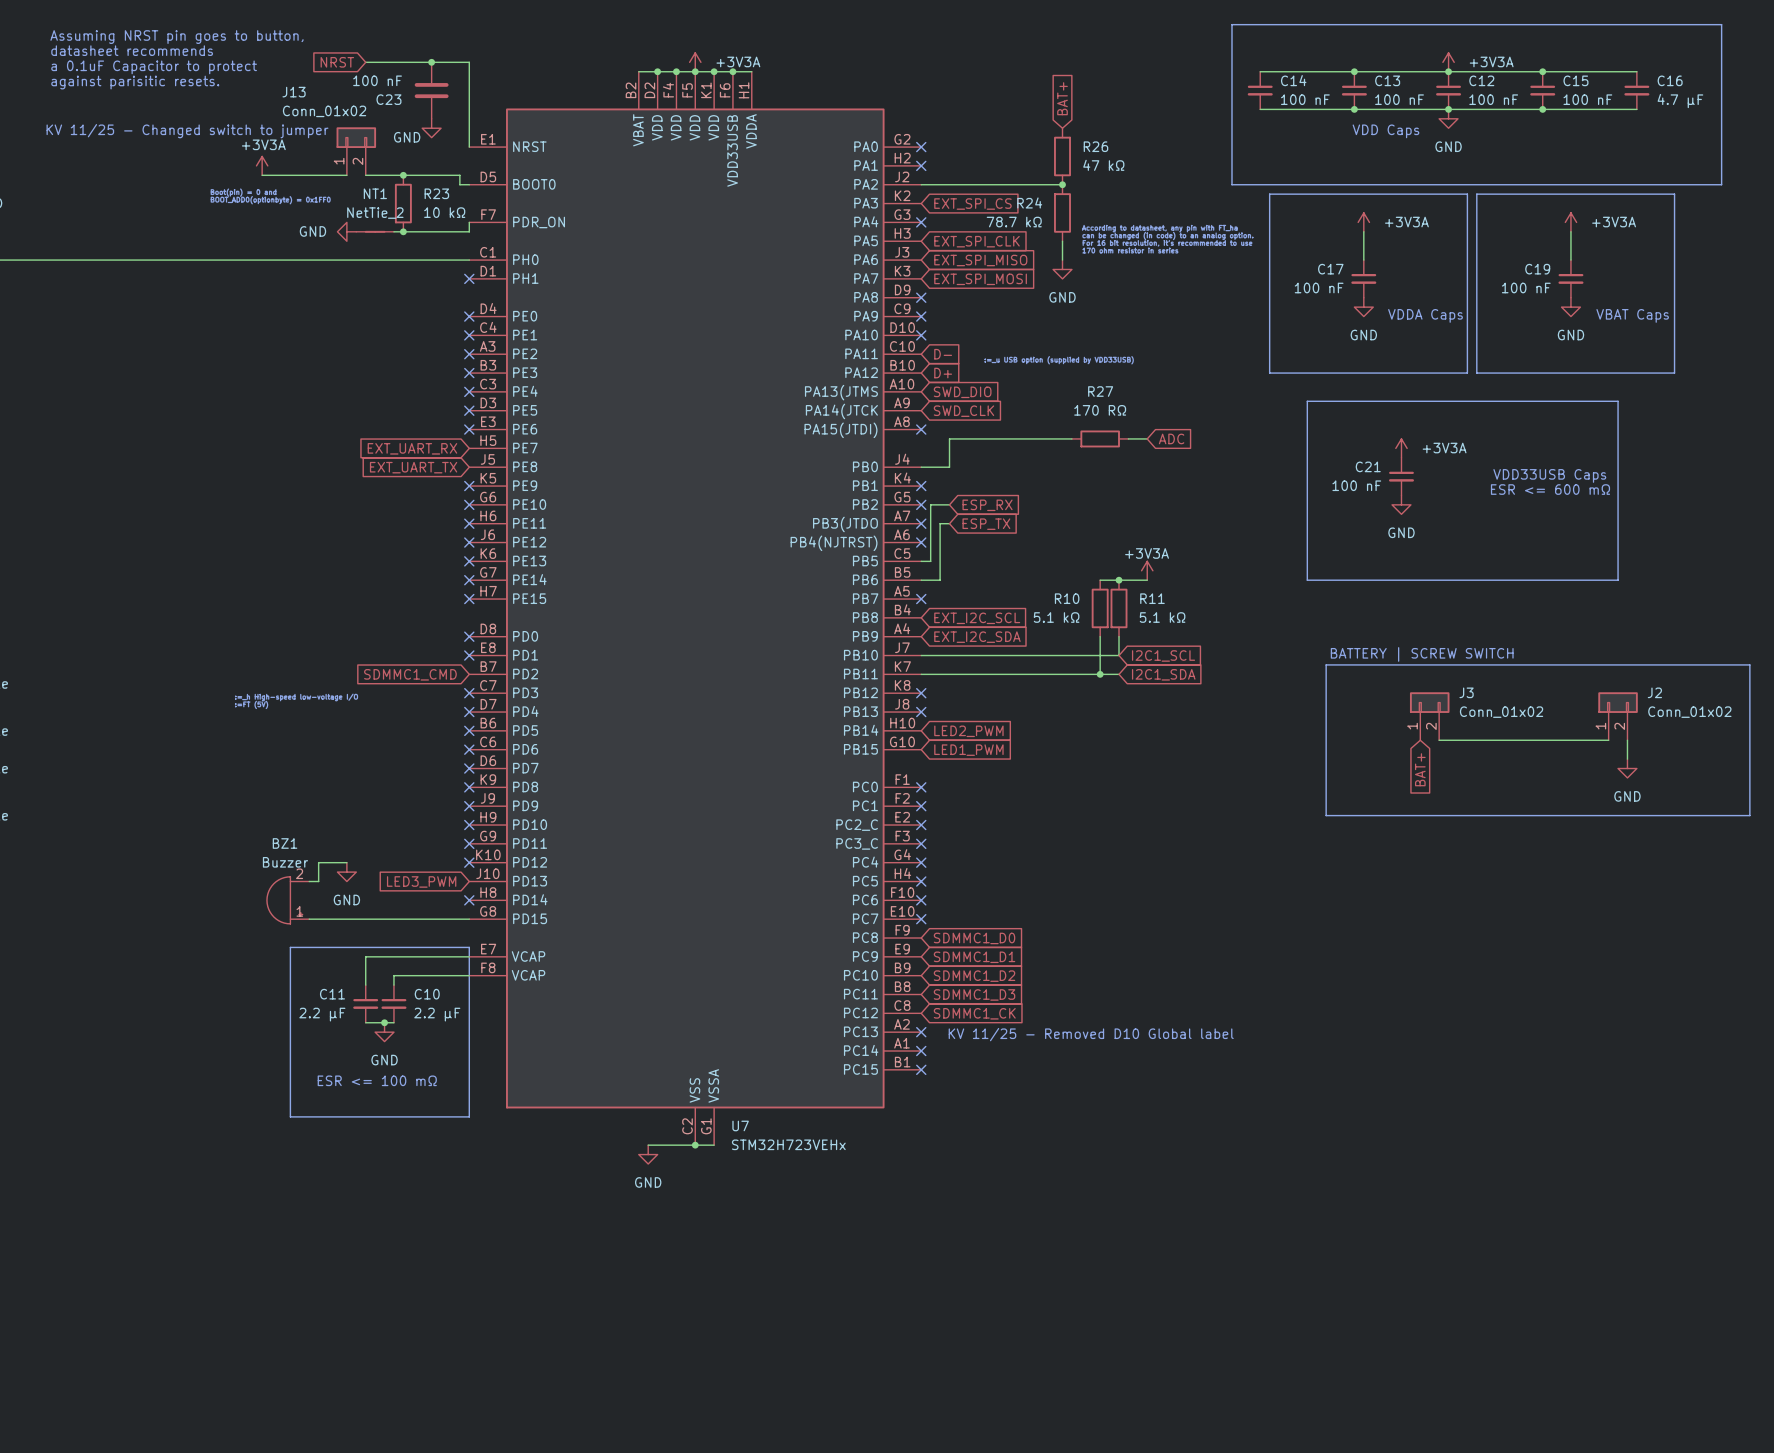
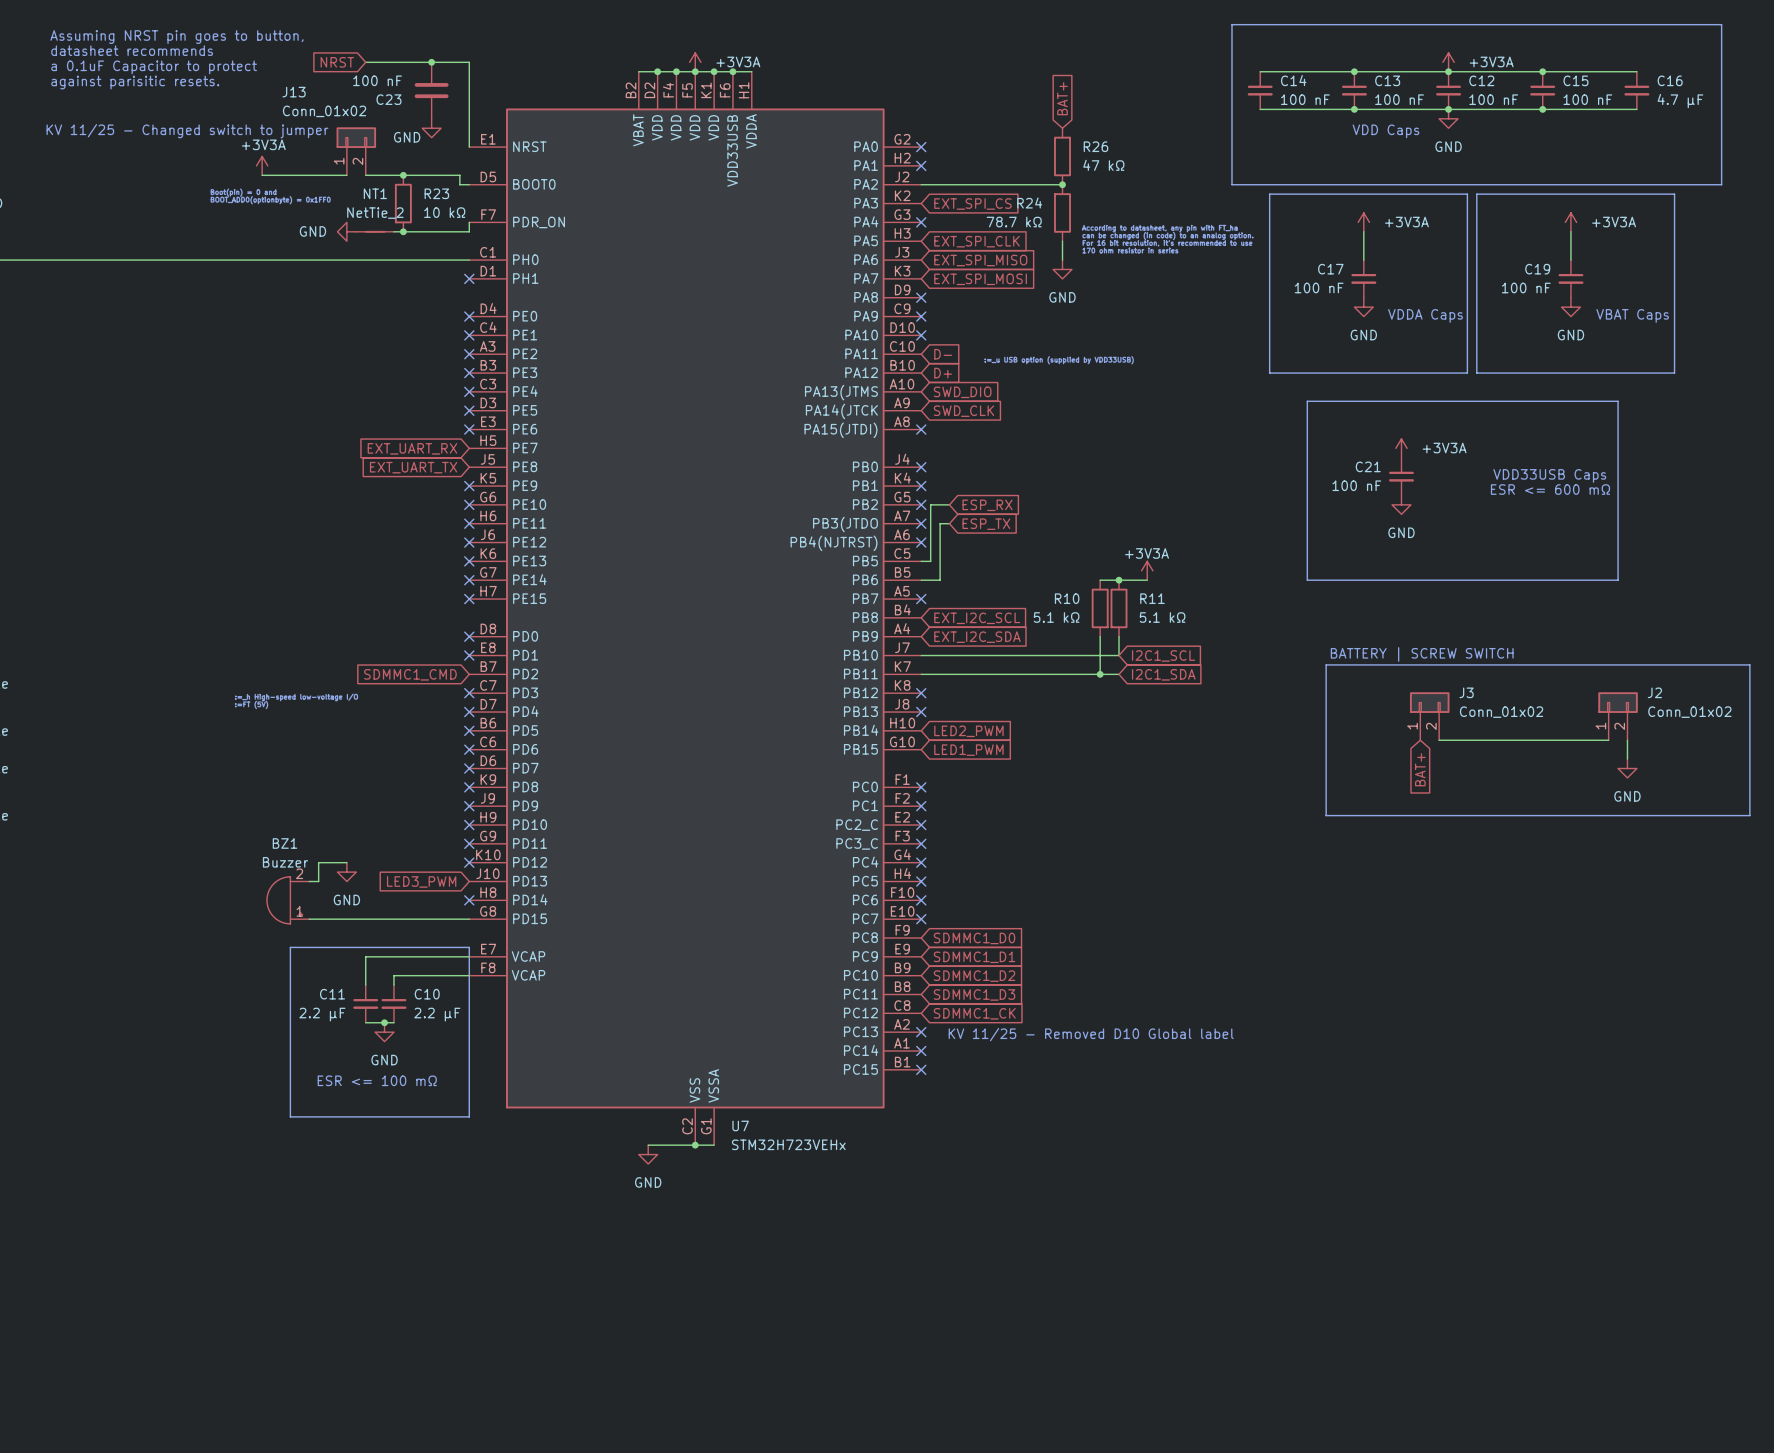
wire: (1071, 438) (949, 438) (949, 467) (921, 467) -> none
R27: 170 RΩ (1100, 438) -> none
wire: (1128, 438) (1147, 438) -> none
global label: ADC (1171, 438) -> none
no-connect mark: none -> (921, 467)

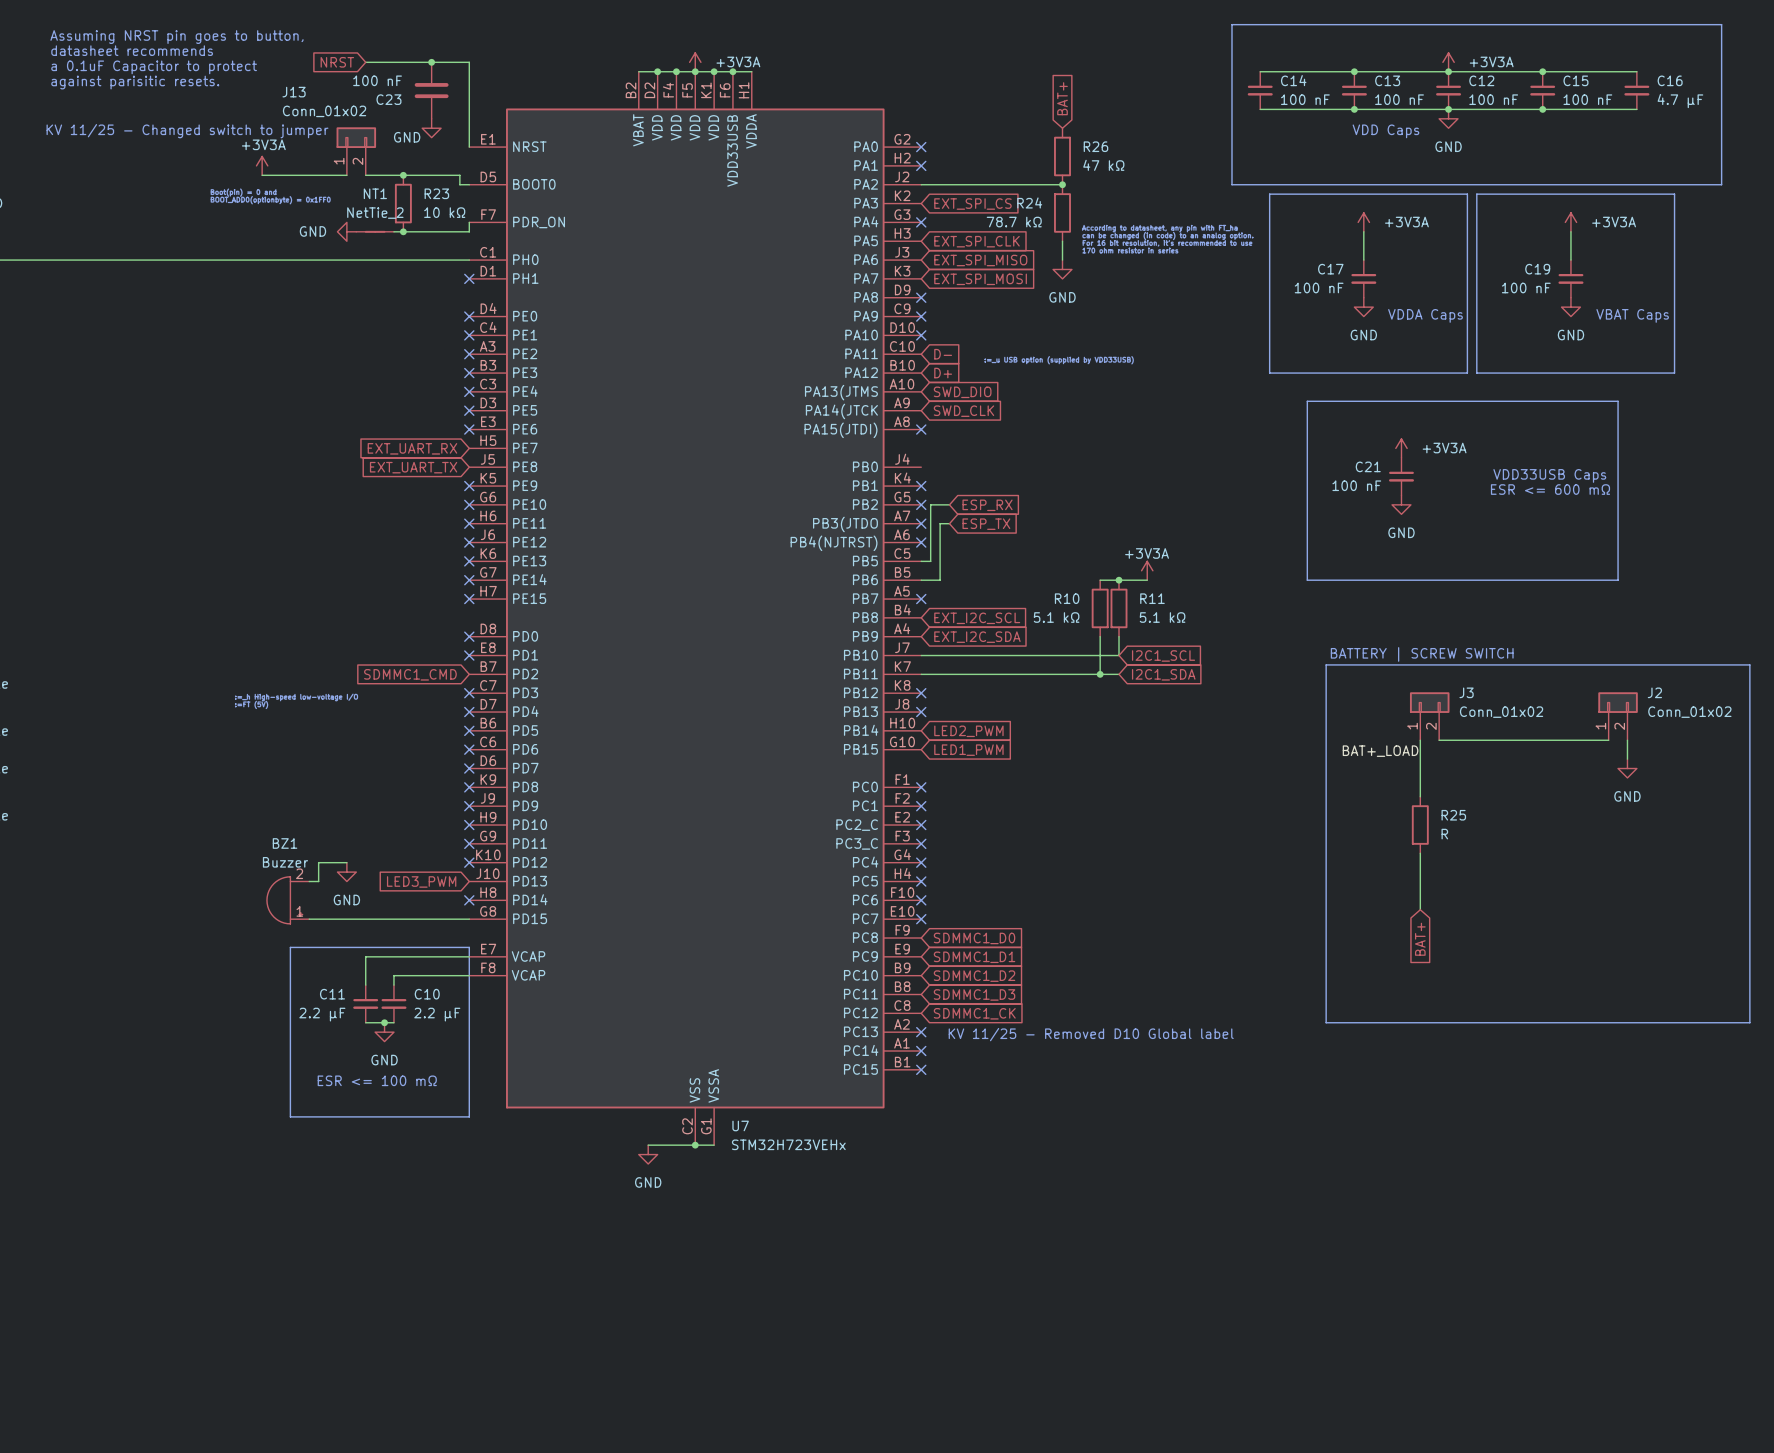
no-connect mark: (921, 467) -> none
wire: none -> (1420, 740) (1420, 796)
label: none -> BAT+_LOAD (1380, 751)
global label position: BAT+ (1420, 769) -> BAT+ (1420, 939)
line: (1326, 815) (1749, 815) -> (1326, 815) (1326, 1022) (1749, 1022) (1749, 815)
R25: none -> R (1420, 825)
wire: none -> (1420, 853) (1420, 909)

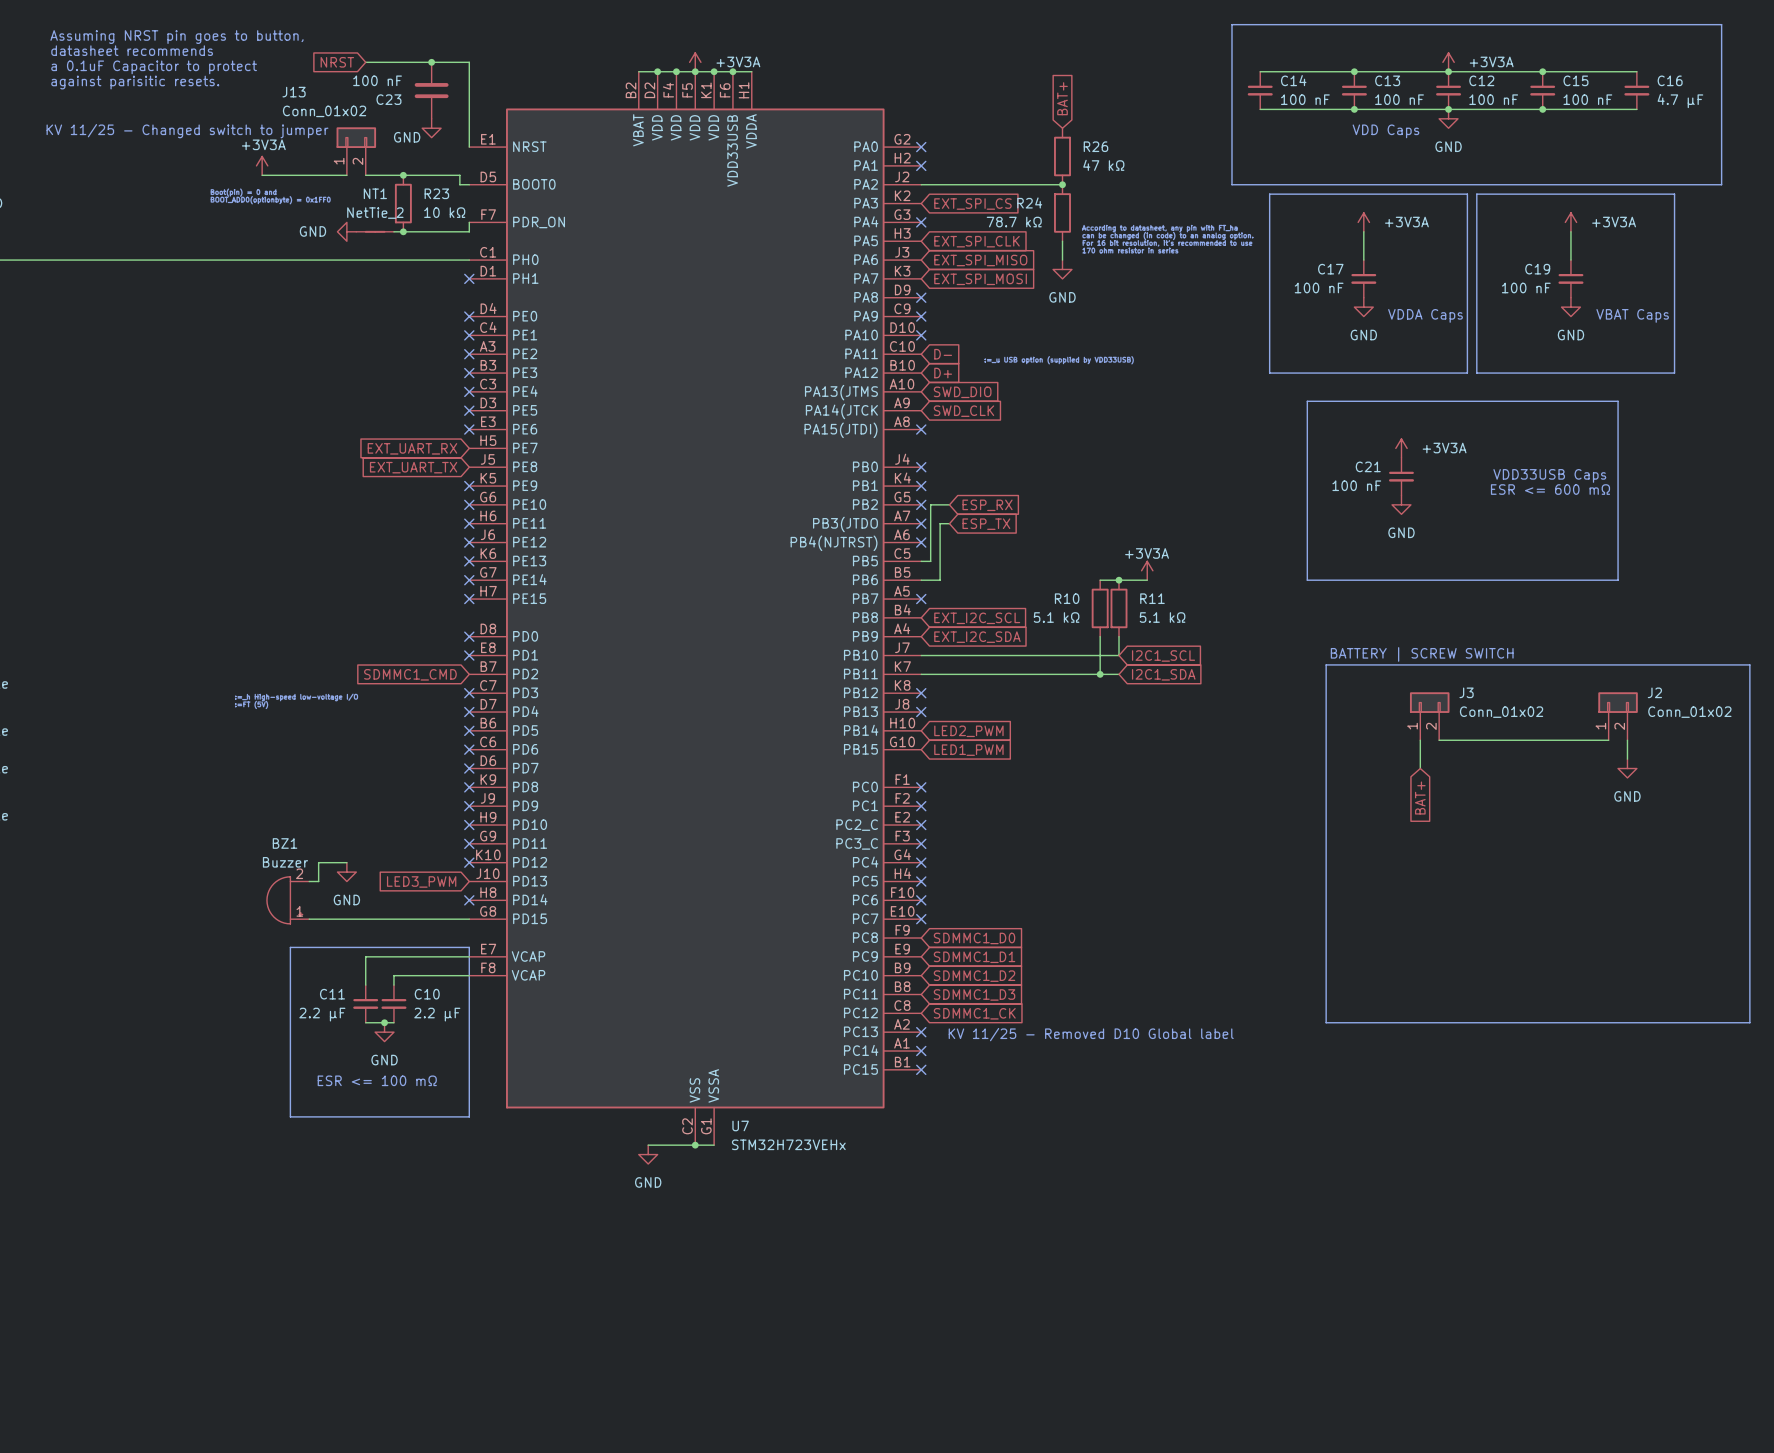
no-connect mark: none -> (921, 467)
label: BAT+_LOAD (1380, 751) -> none
wire: (1420, 768) (1420, 796) -> none
R25: R (1420, 825) -> none
wire: (1420, 853) (1420, 909) -> none
global label position: BAT+ (1420, 939) -> BAT+ (1420, 798)

